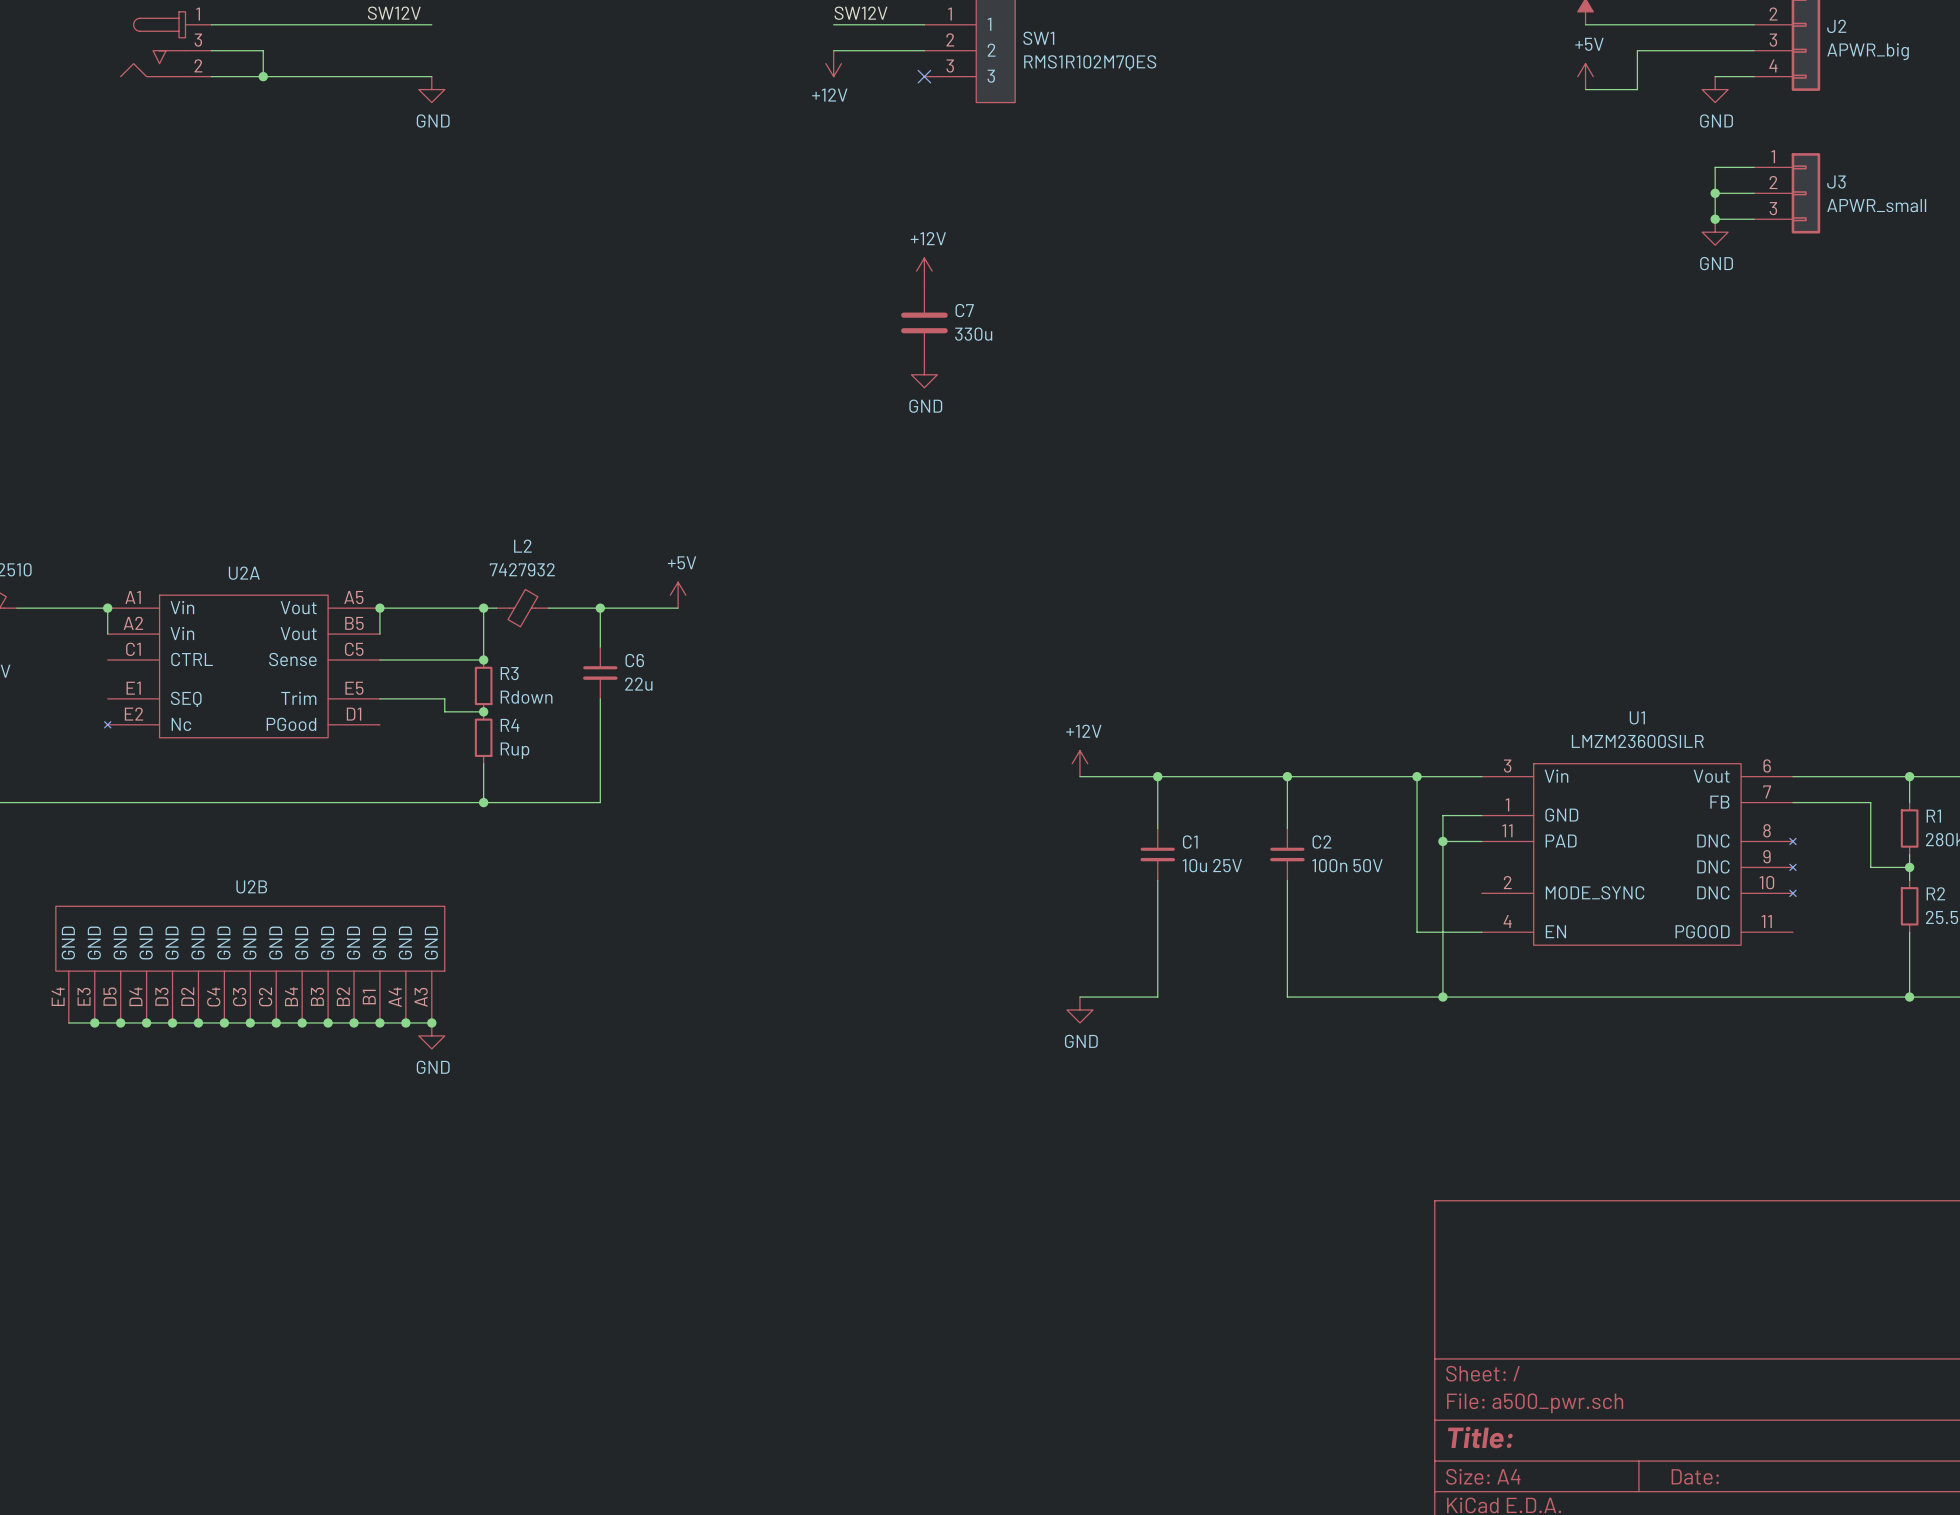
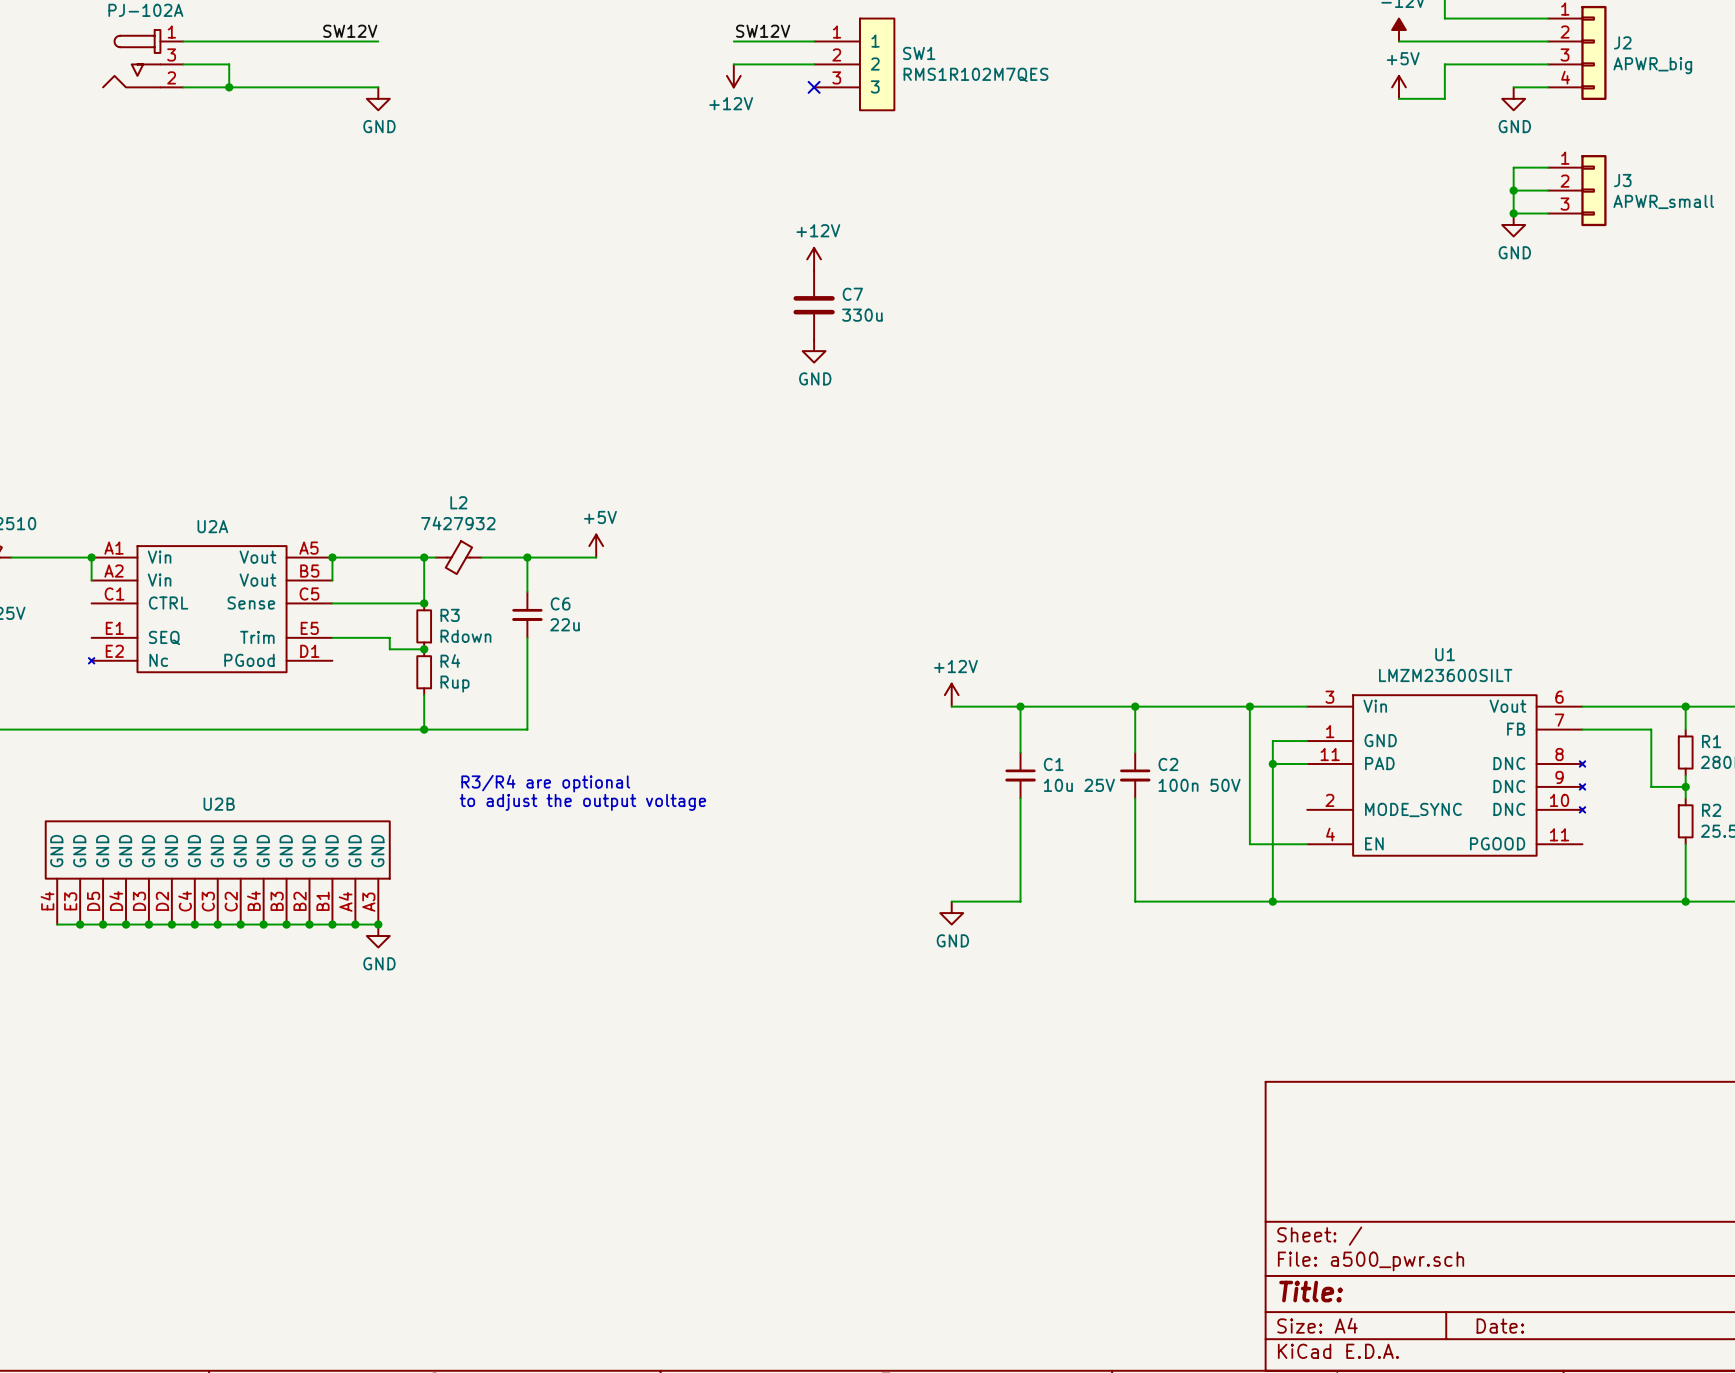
U1 value: LMZM23600SILR (1637, 741) -> LMZM23600SILT (1445, 675)
text: none -> R3/R4 are optional (545, 783)
text: none -> to adjust the output voltage (582, 802)

